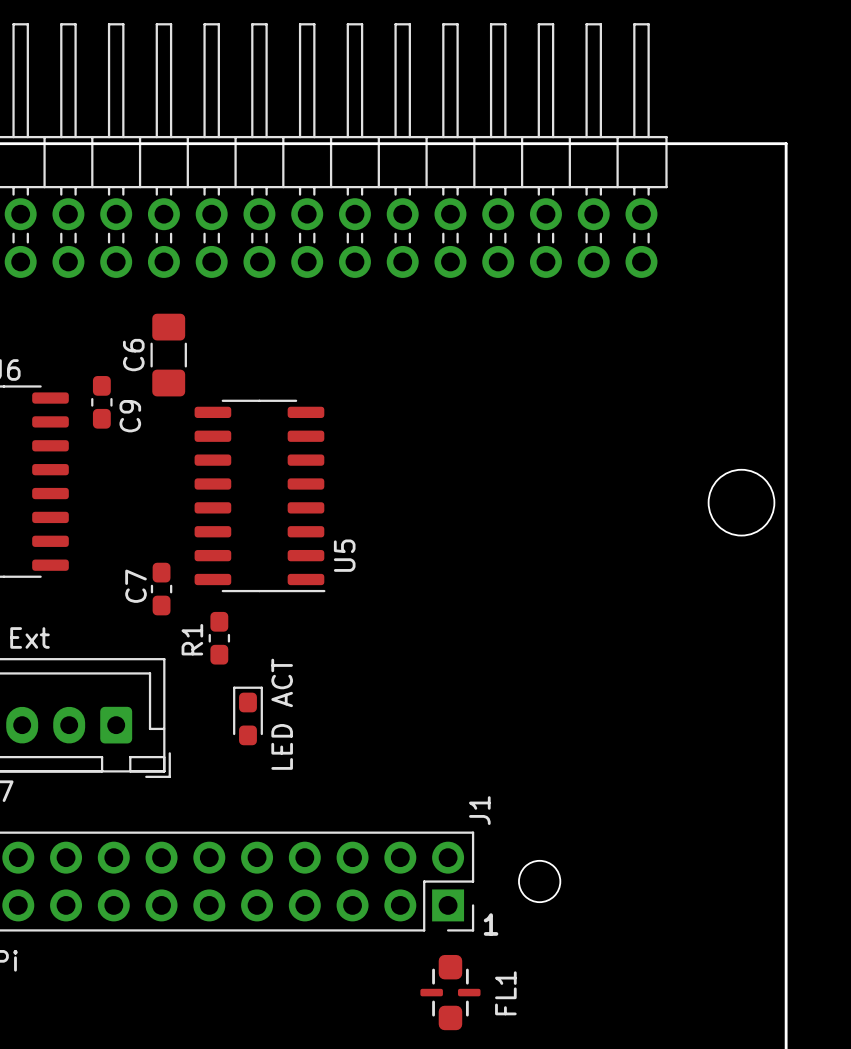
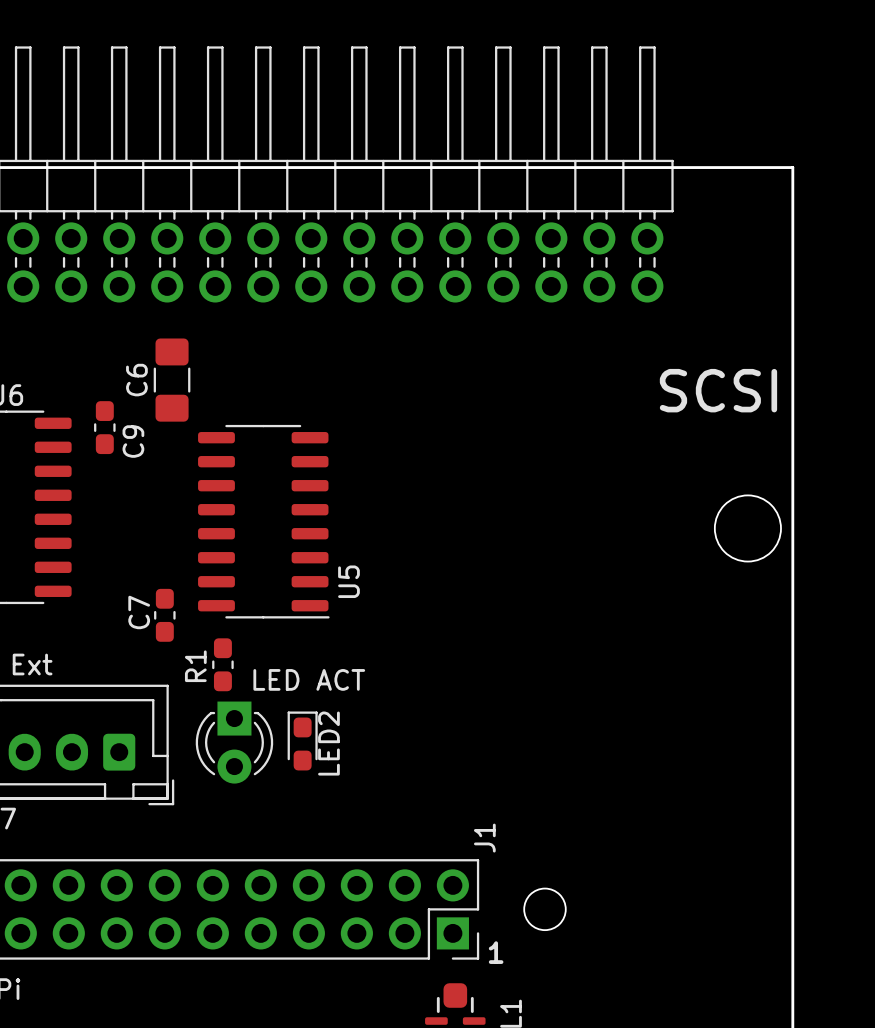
text: none -> SCSI (718, 390)
part footprint: [233, 686, 263, 746] -> [195, 701, 274, 784]
part value position: LED ACT (282, 714) -> LED ACT (309, 679)
LED2: none -> (302, 740)

